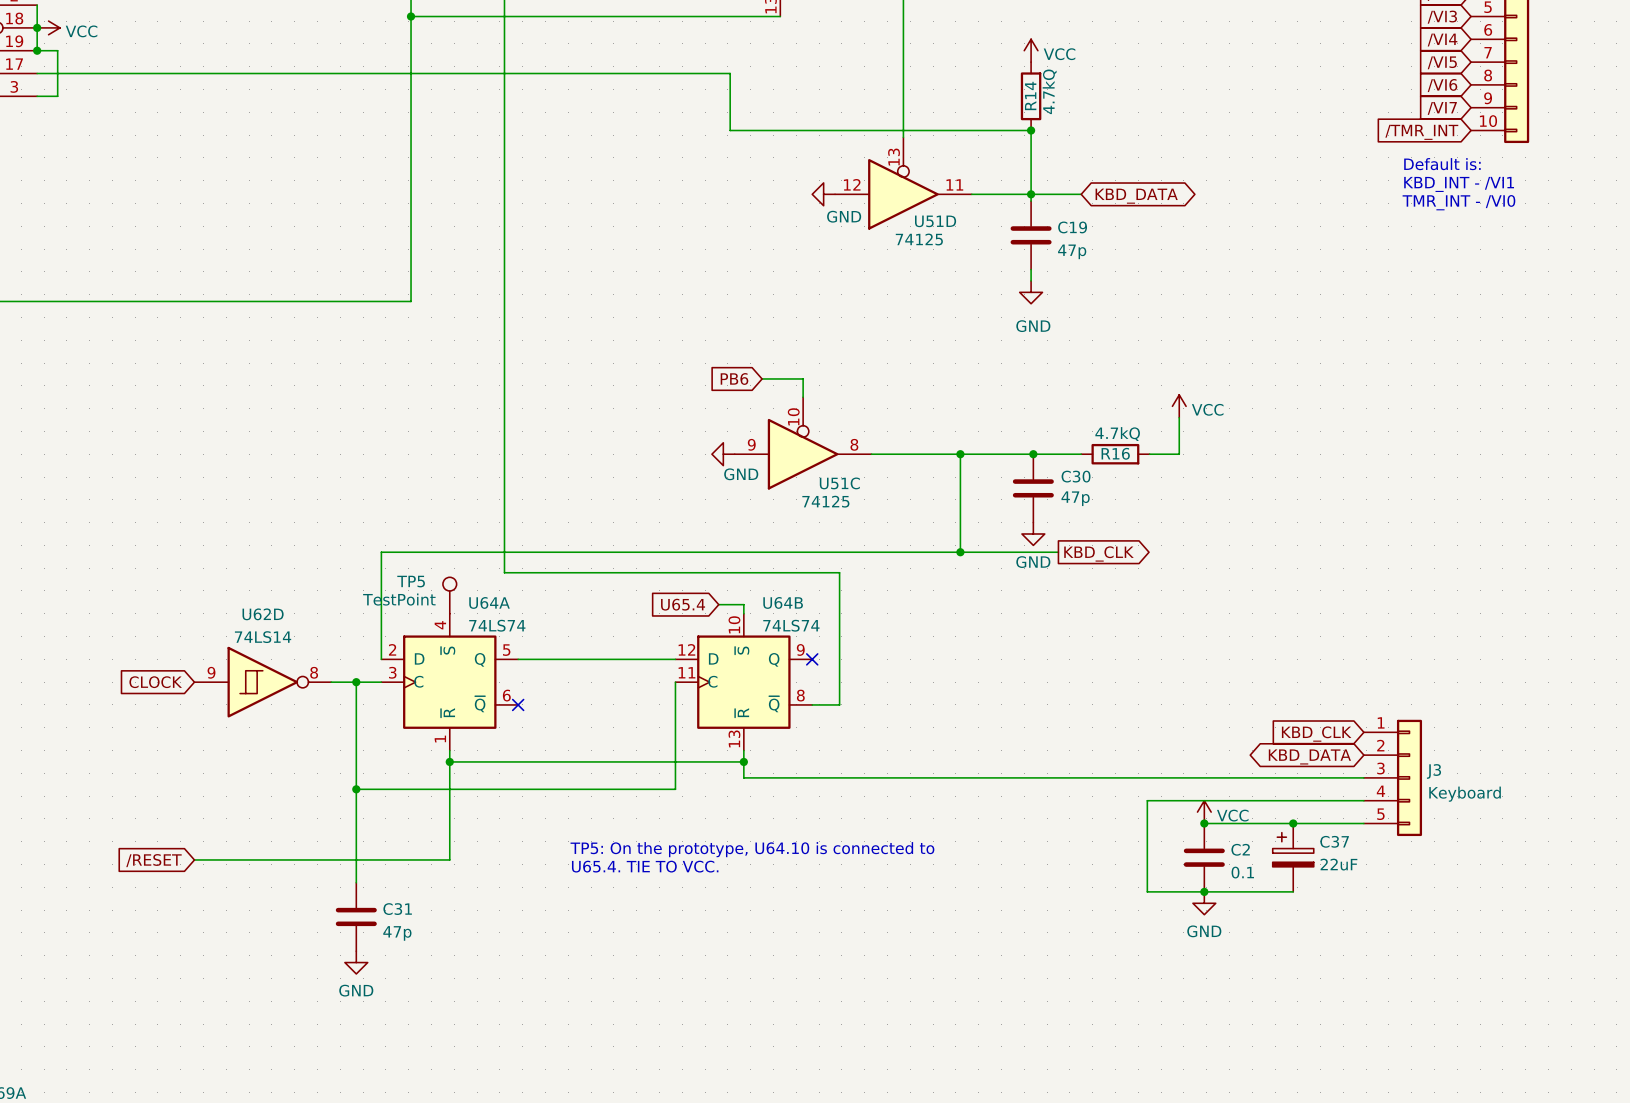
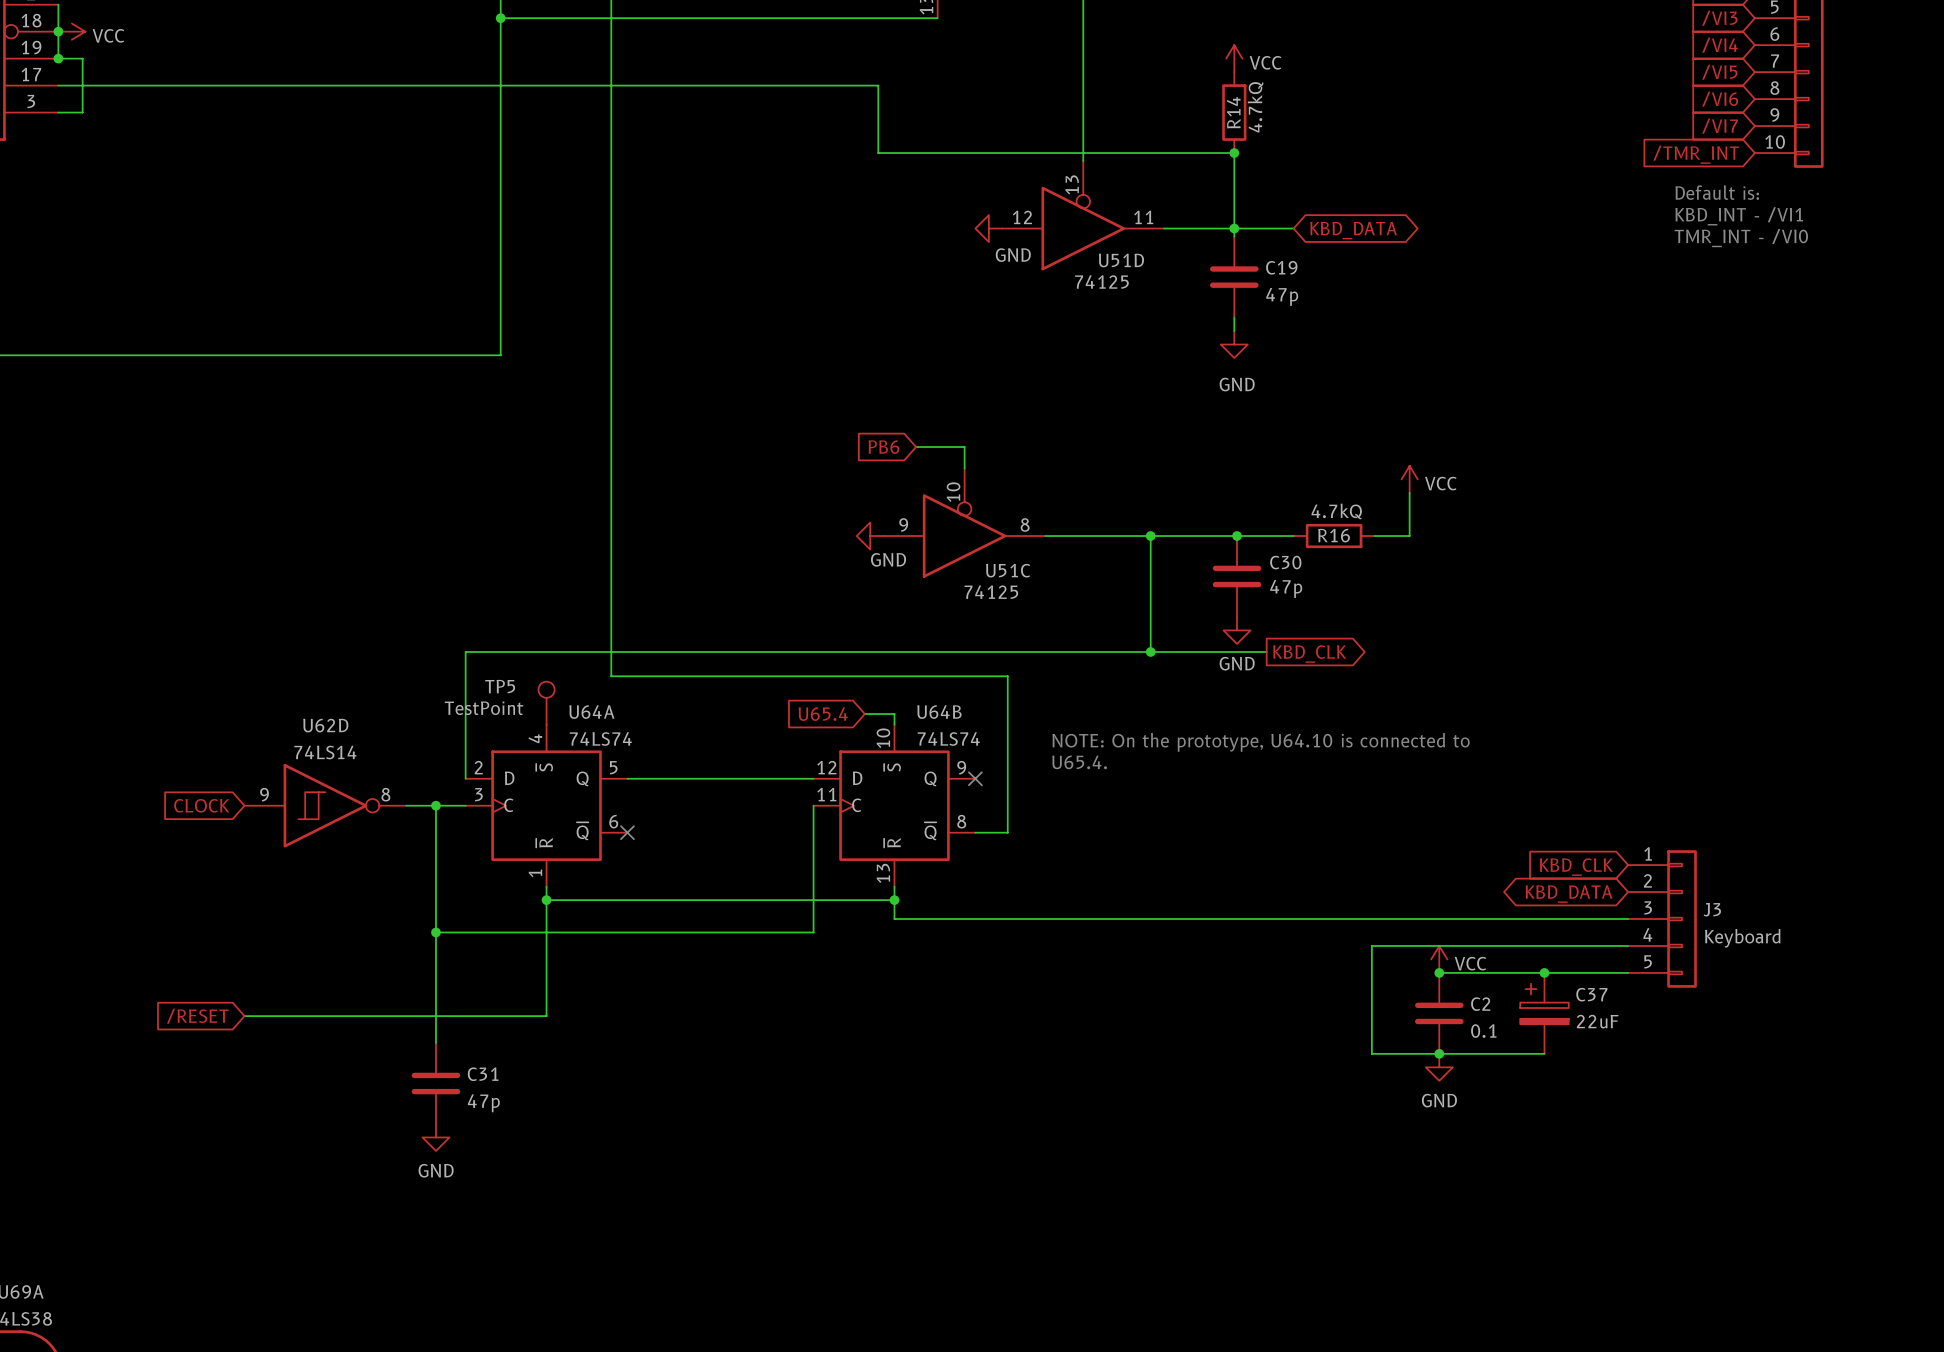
text: none -> NOTE: On the prototype, U64.10 is connected to (1261, 742)
text: none -> U65.4. (1079, 762)
text: TP5: On the prototype, U64.10 is connected to (752, 849) -> none
text: U65.4. TIE TO VCC. (645, 866) -> none

